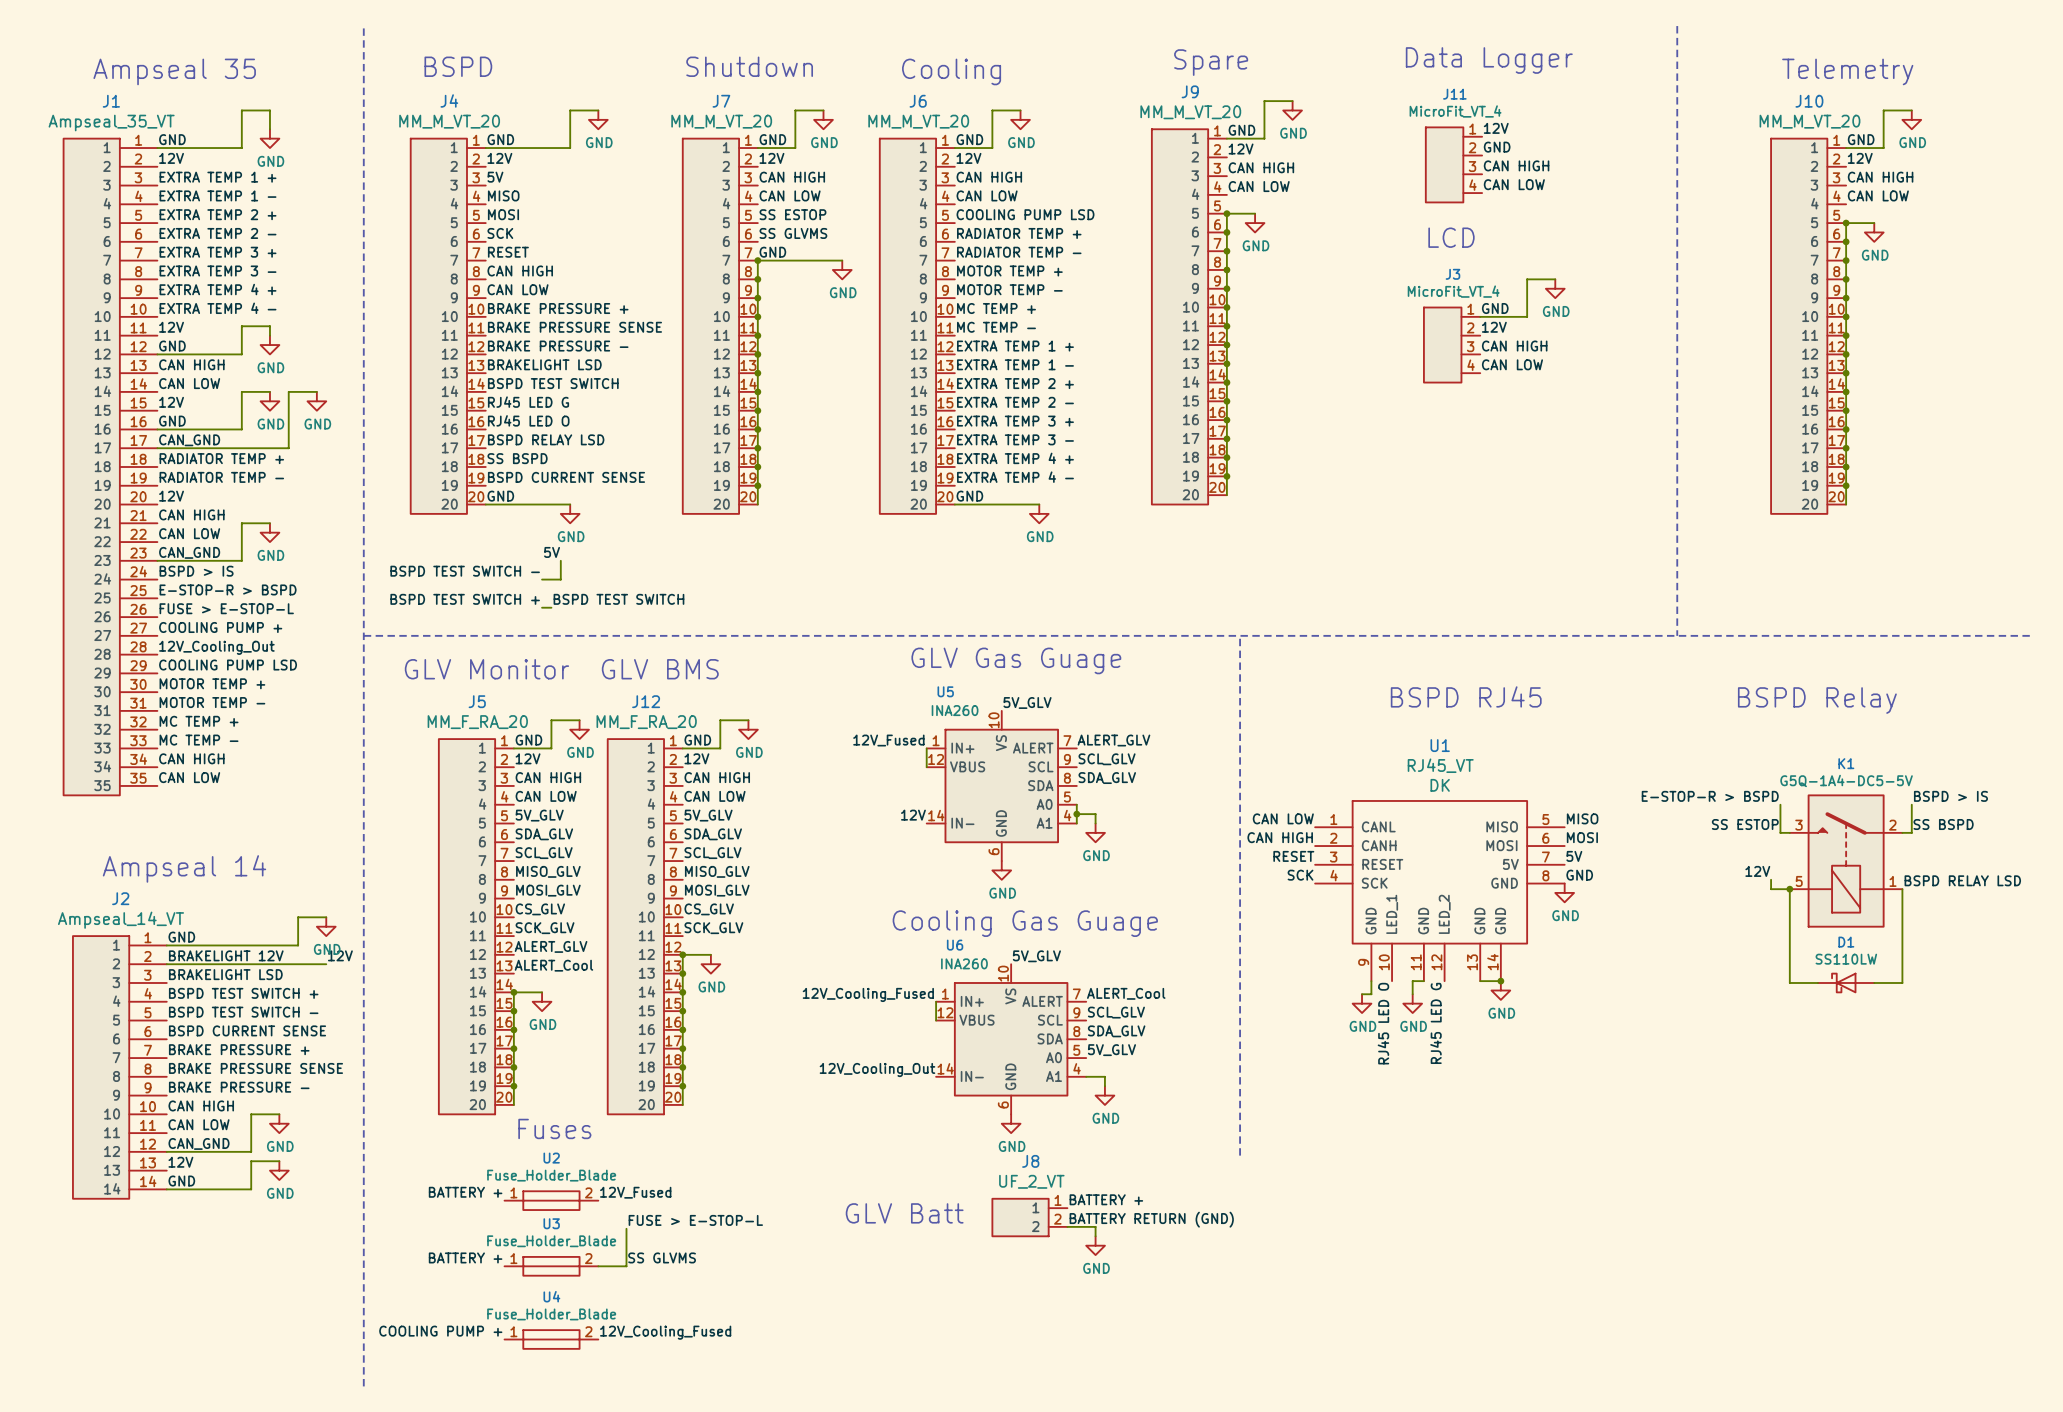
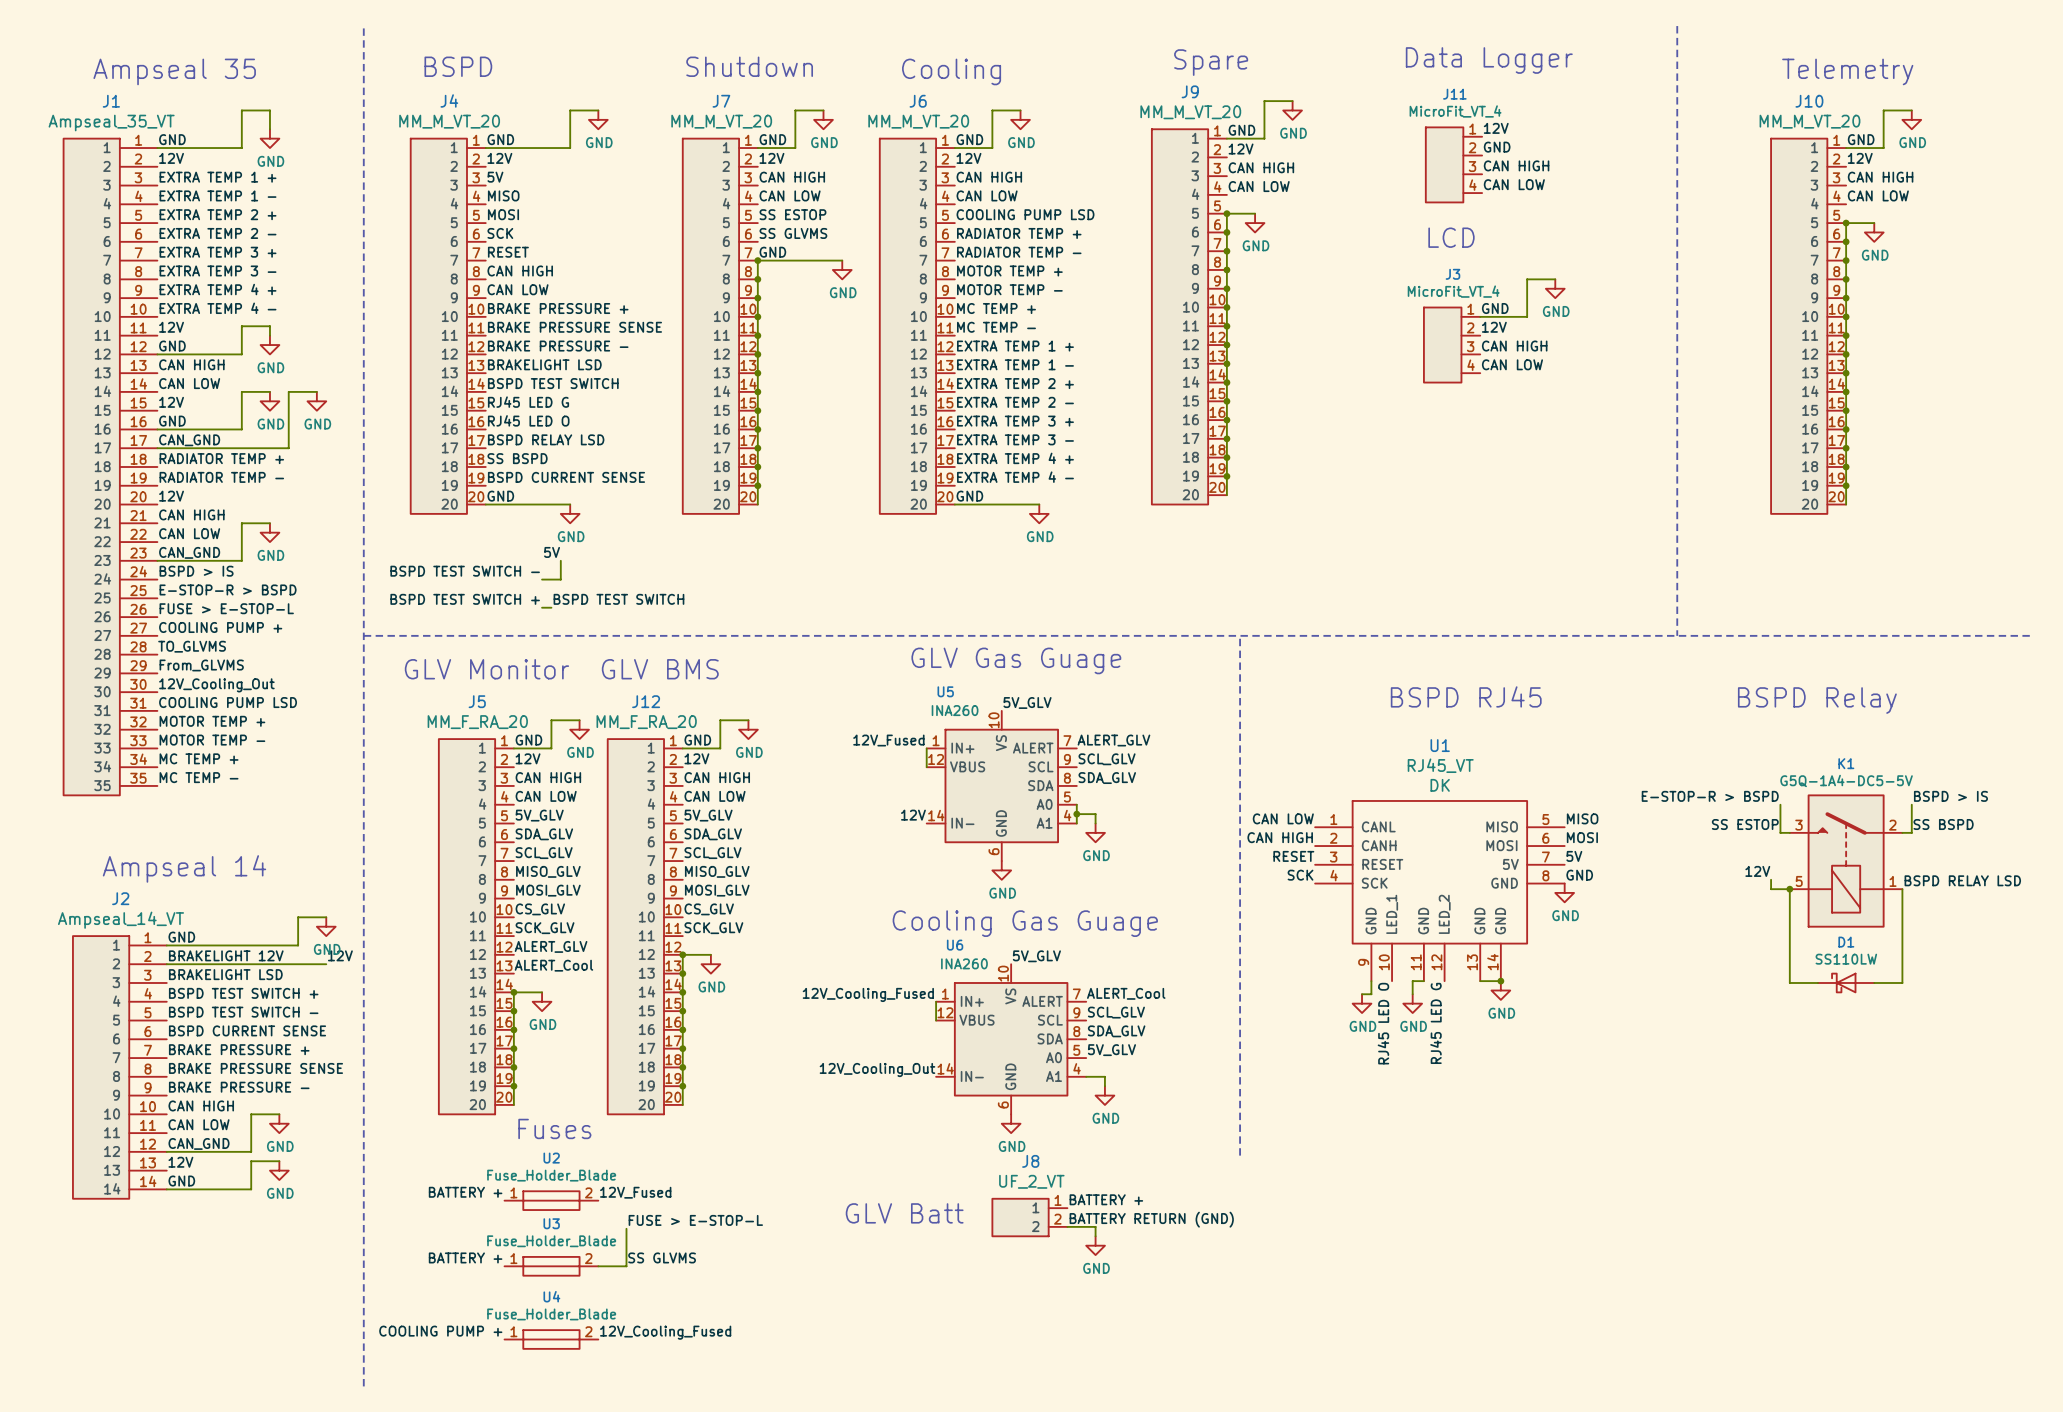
label: 12V_Cooling_Out (216, 647) -> TO_GLVMS (192, 646)
label: COOLING PUMP LSD (228, 665) -> From_GLVMS (201, 665)
label: MOTOR TEMP + (212, 683) -> 12V_Cooling_Out (216, 685)
label: MOTOR TEMP - (212, 702) -> COOLING PUMP LSD (228, 702)
label: MC TEMP + (199, 721) -> MOTOR TEMP + (212, 721)
label: MC TEMP - (199, 740) -> MOTOR TEMP - (212, 740)
label: CAN HIGH (191, 758) -> MC TEMP + (199, 758)
label: CAN LOW (189, 777) -> MC TEMP - (199, 777)

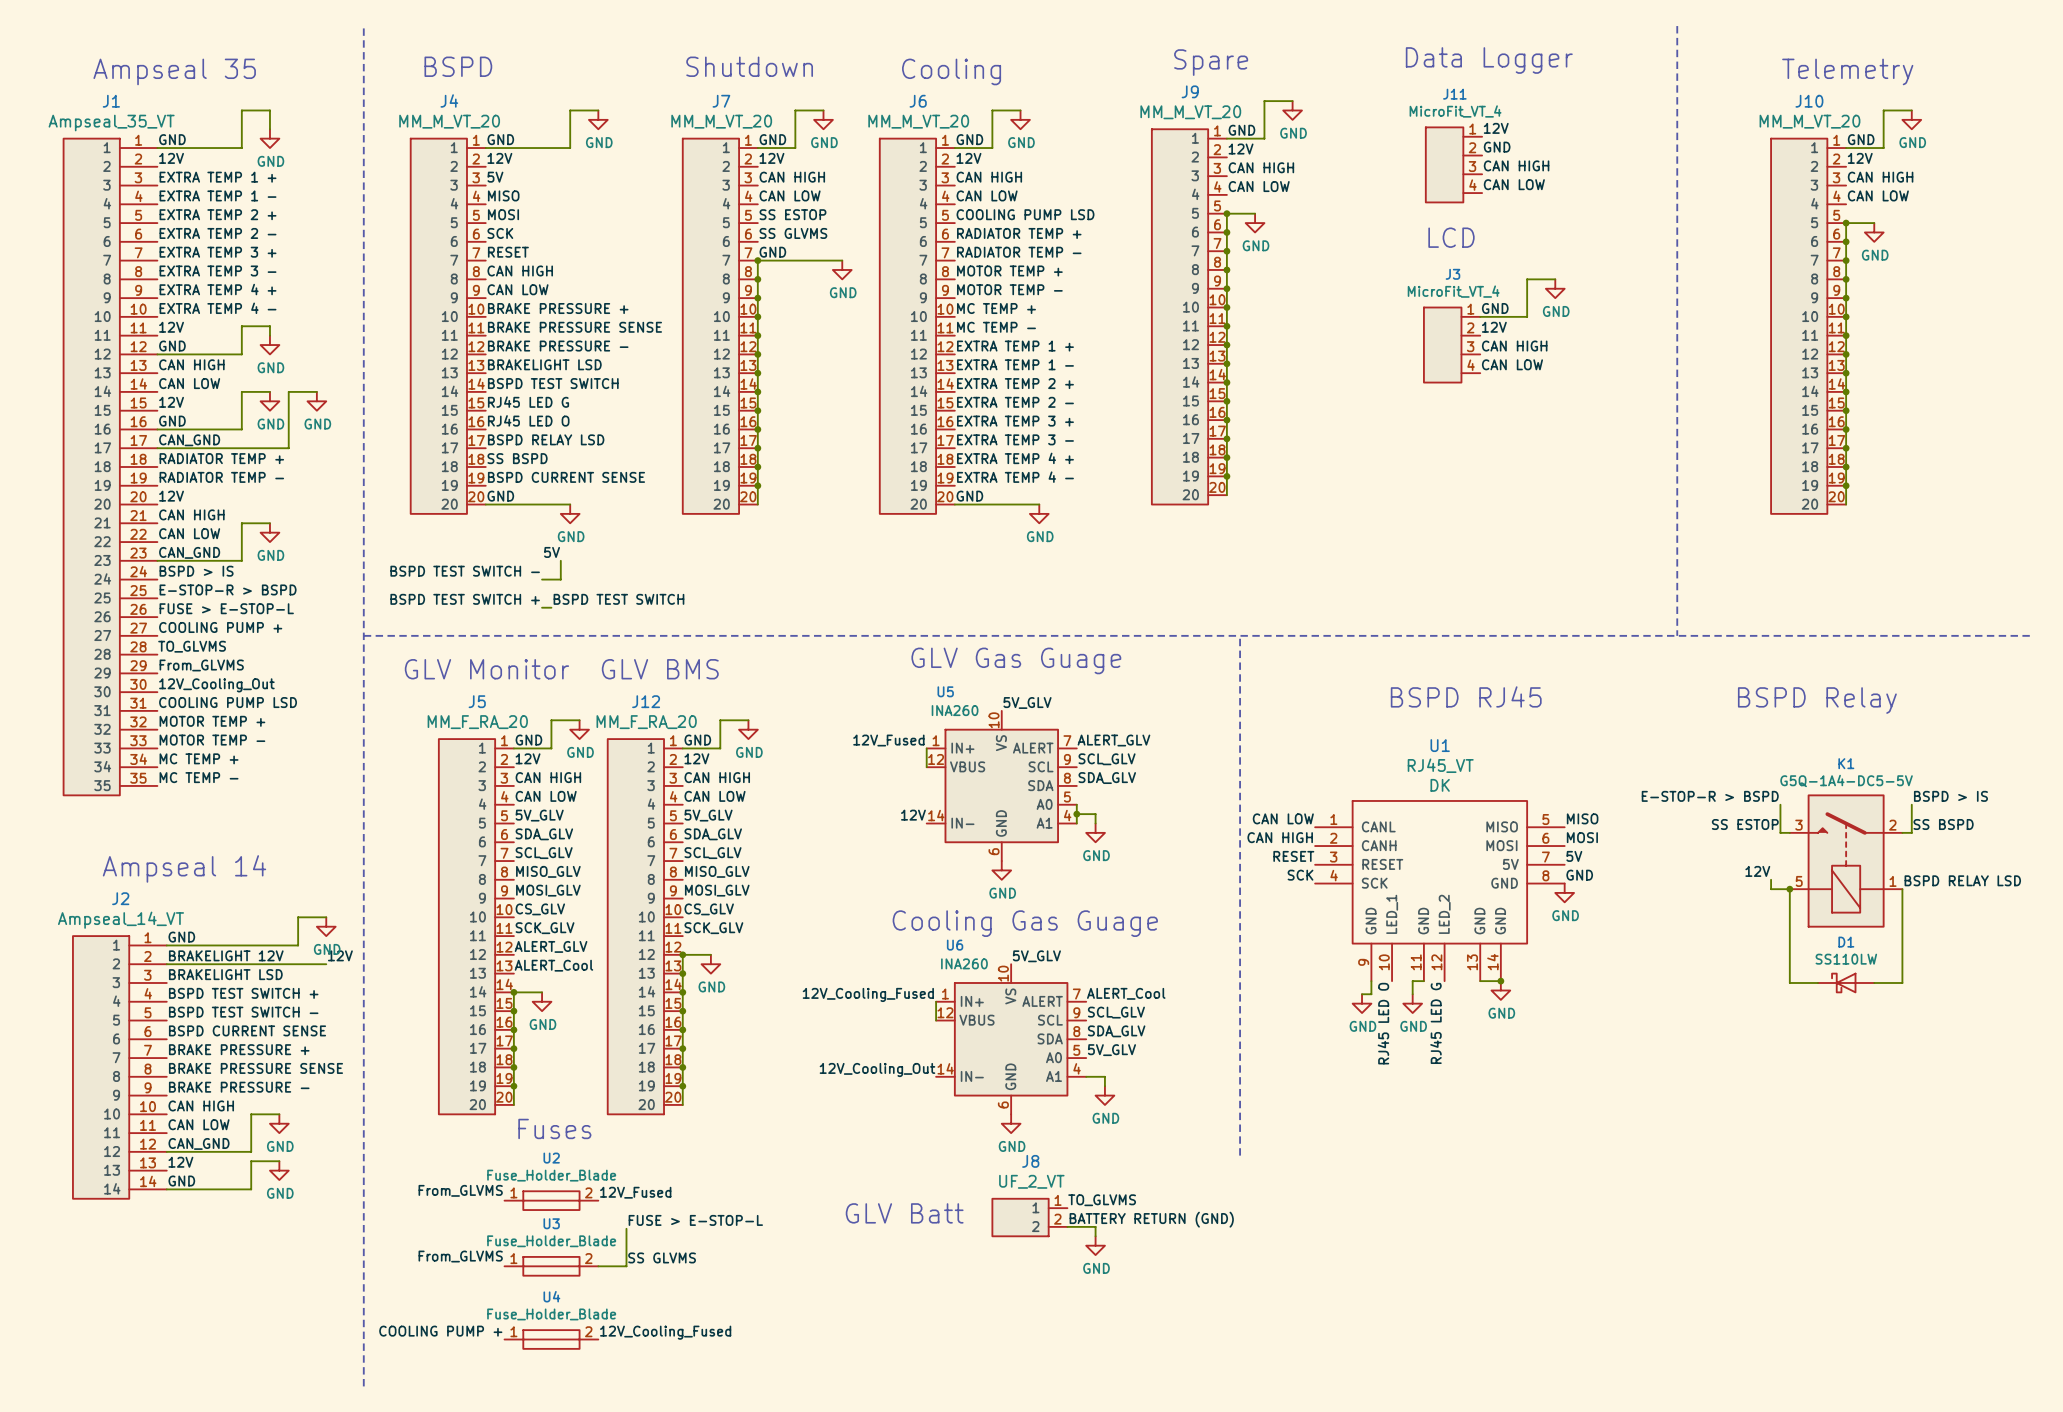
label: BATTERY + (465, 1192) -> From_GLVMS (460, 1190)
label: BATTERY + (1106, 1199) -> TO_GLVMS (1102, 1200)
label: BATTERY + (465, 1257) -> From_GLVMS (460, 1256)

